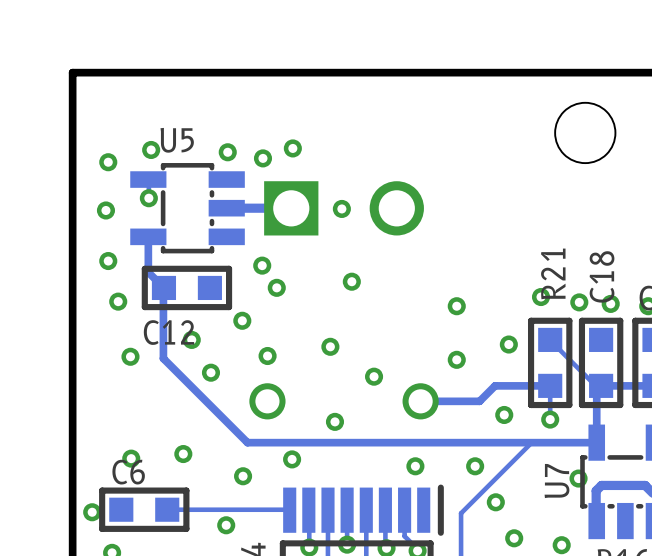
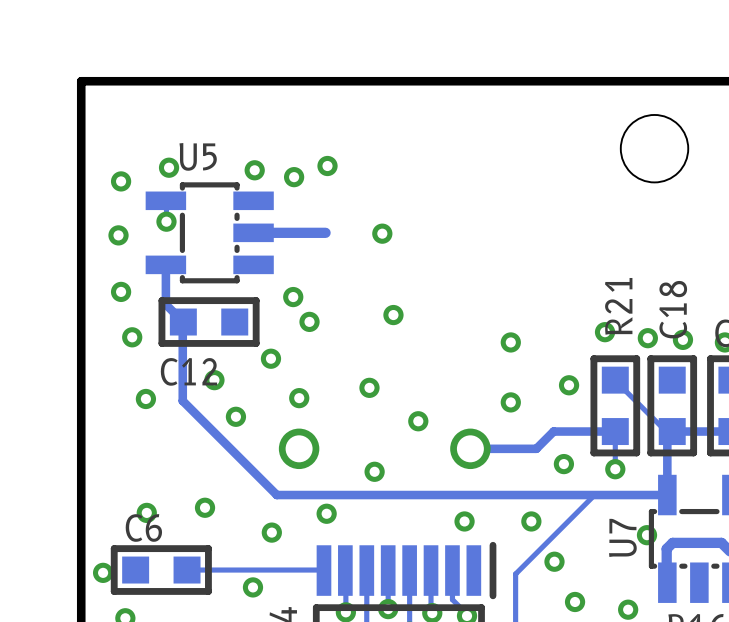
part: (344, 208) -> none

